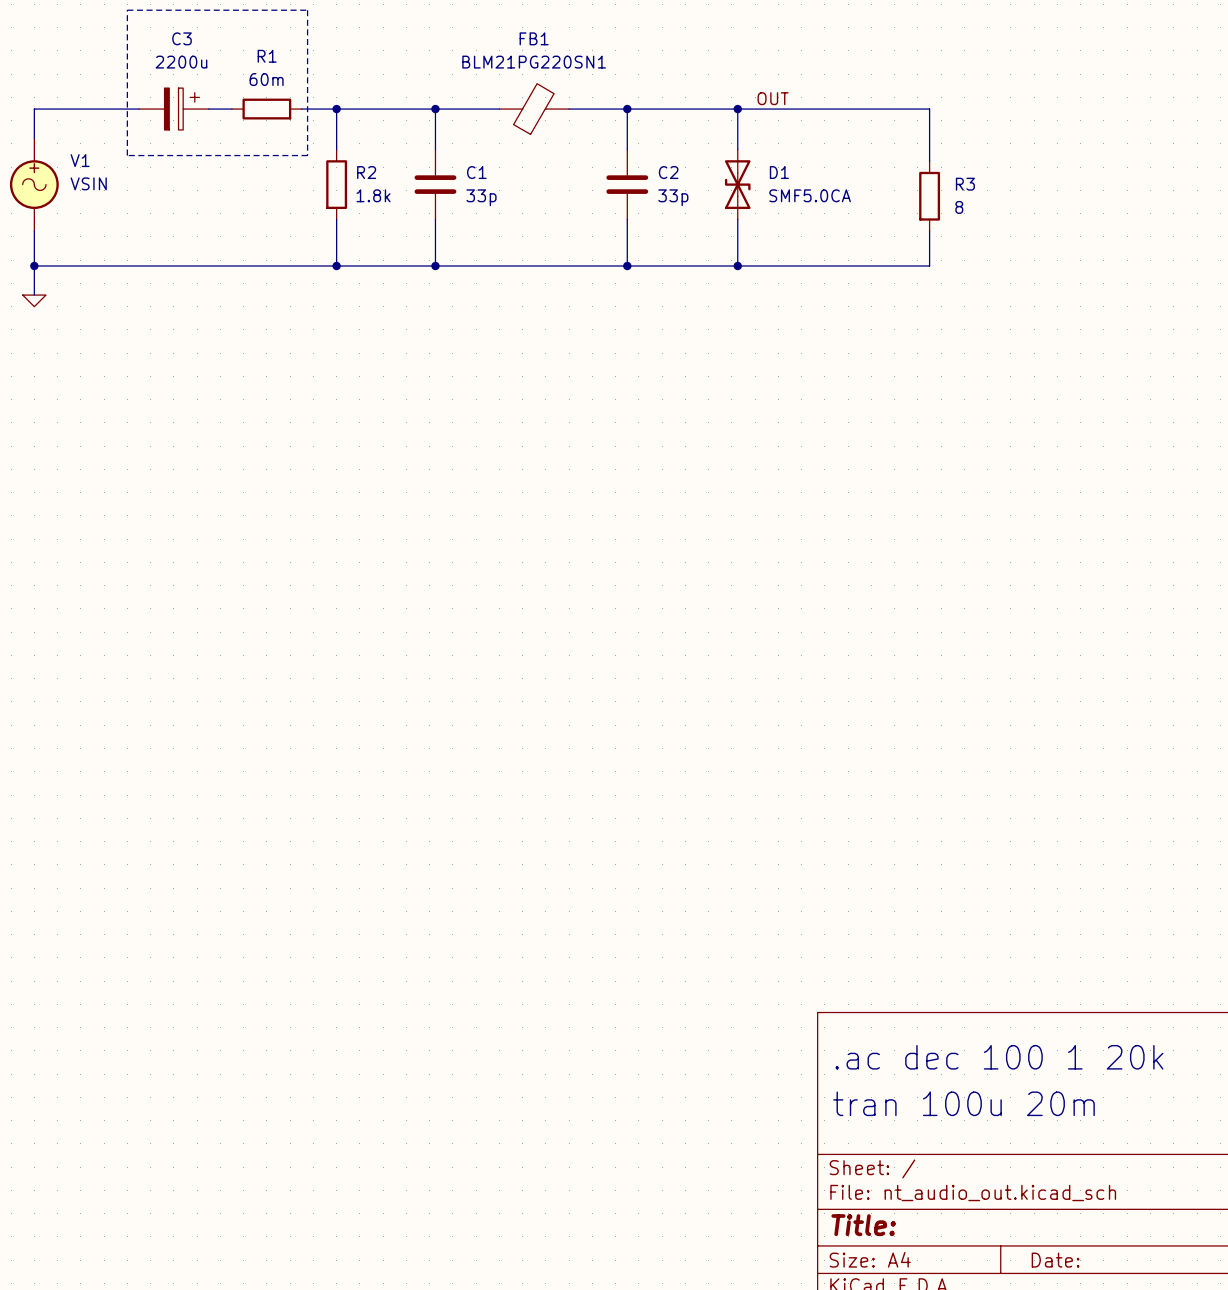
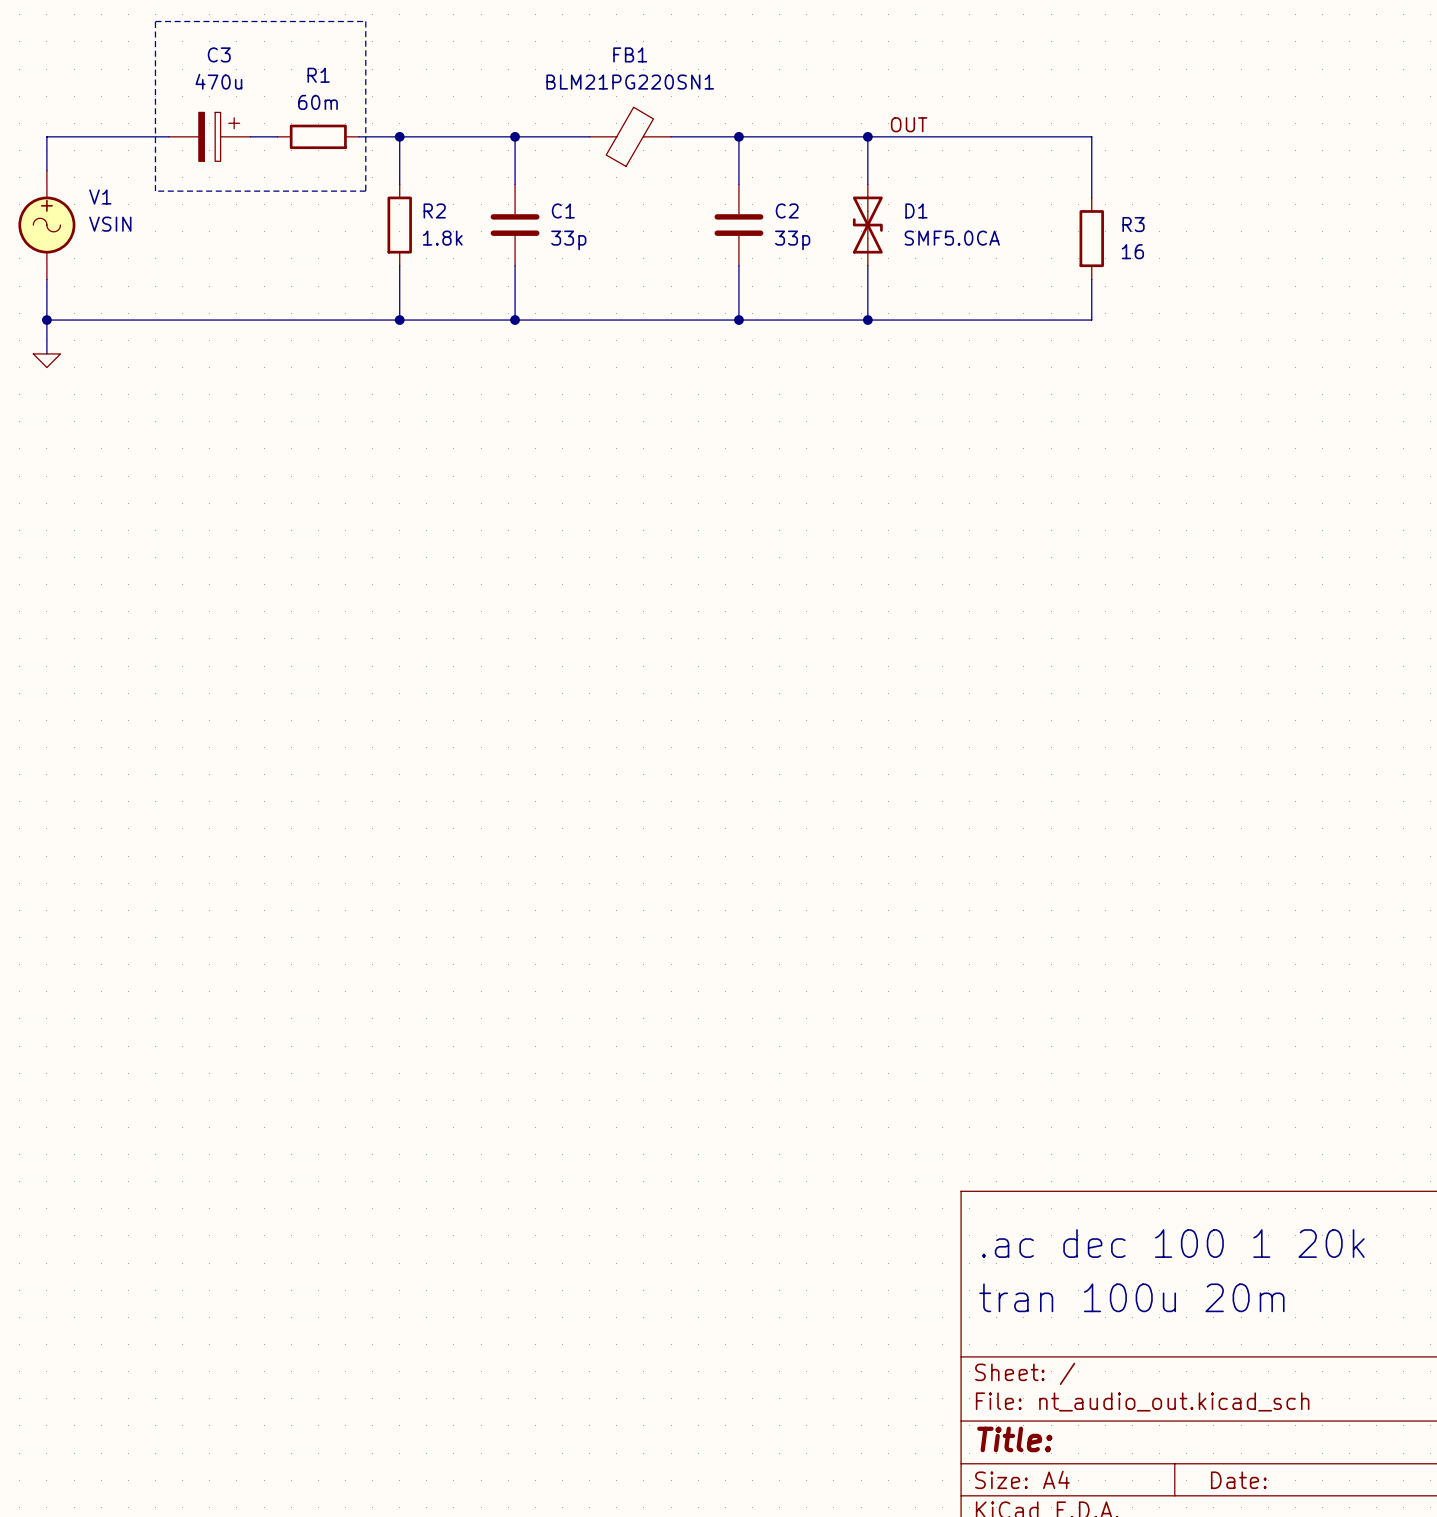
C3 value: 2200u (181, 62) -> 470u (218, 81)
R3 value: 8 (959, 207) -> 16 (1132, 251)

